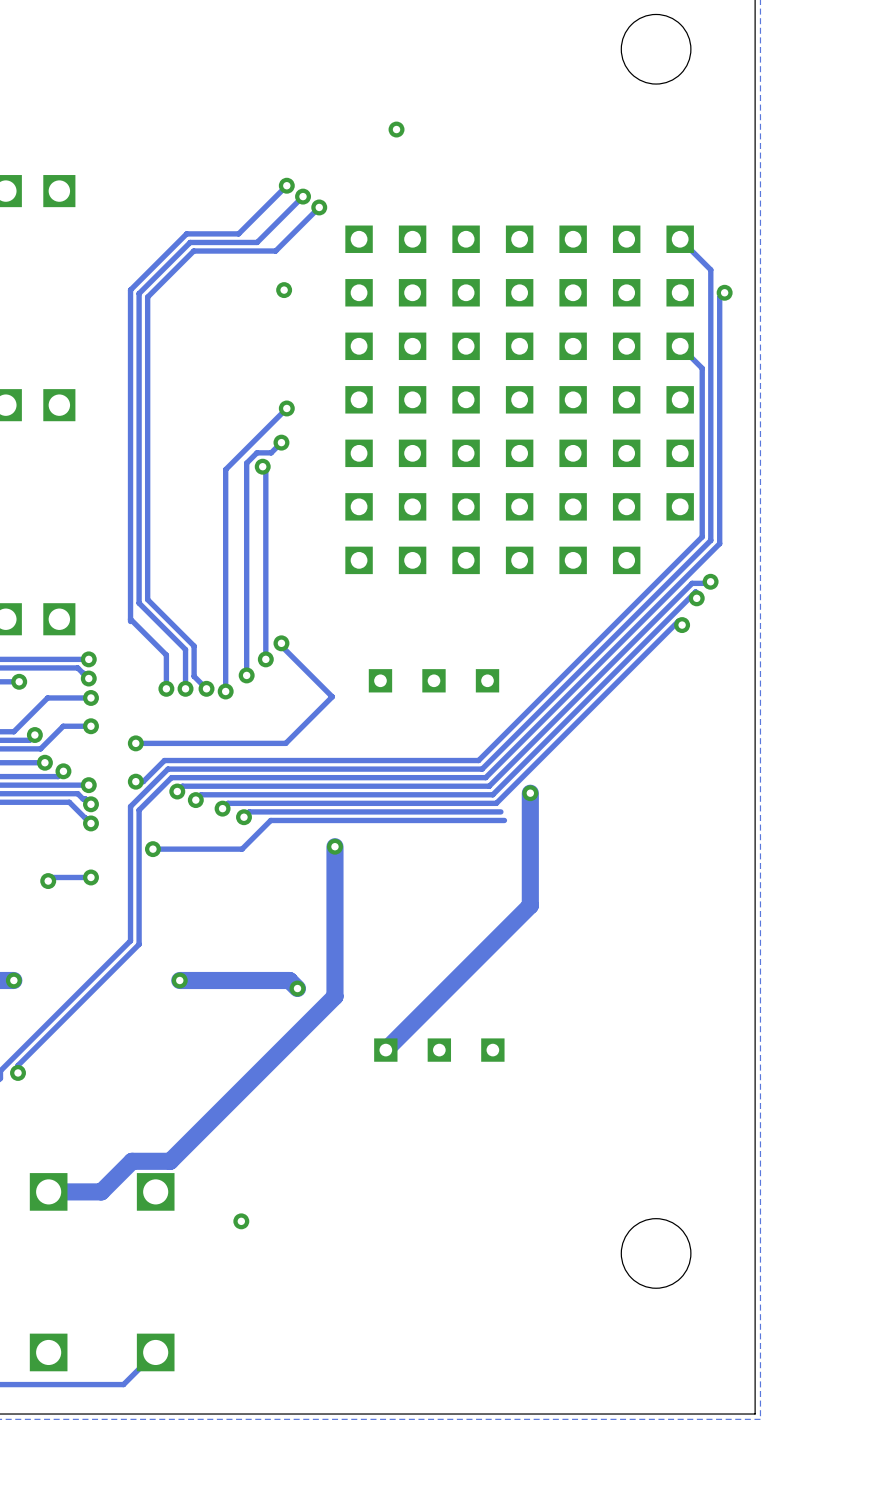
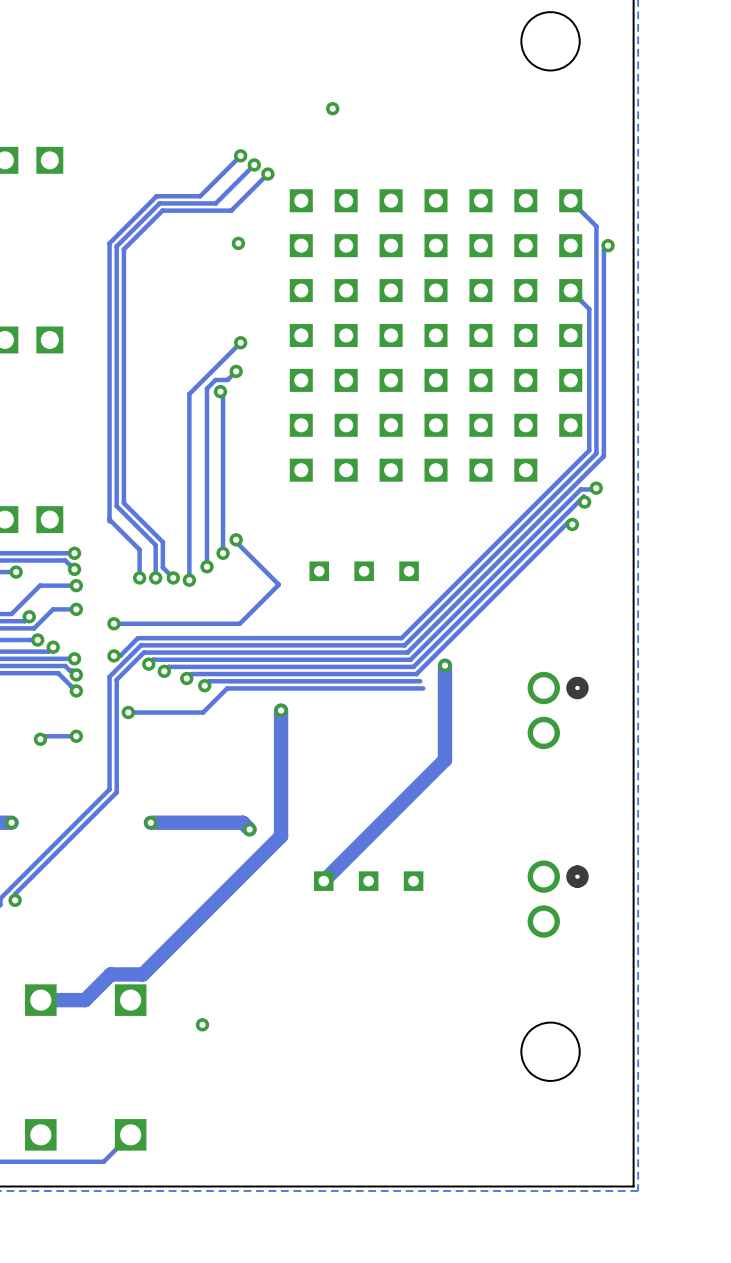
part: none -> (558, 710)
part: none -> (558, 899)

